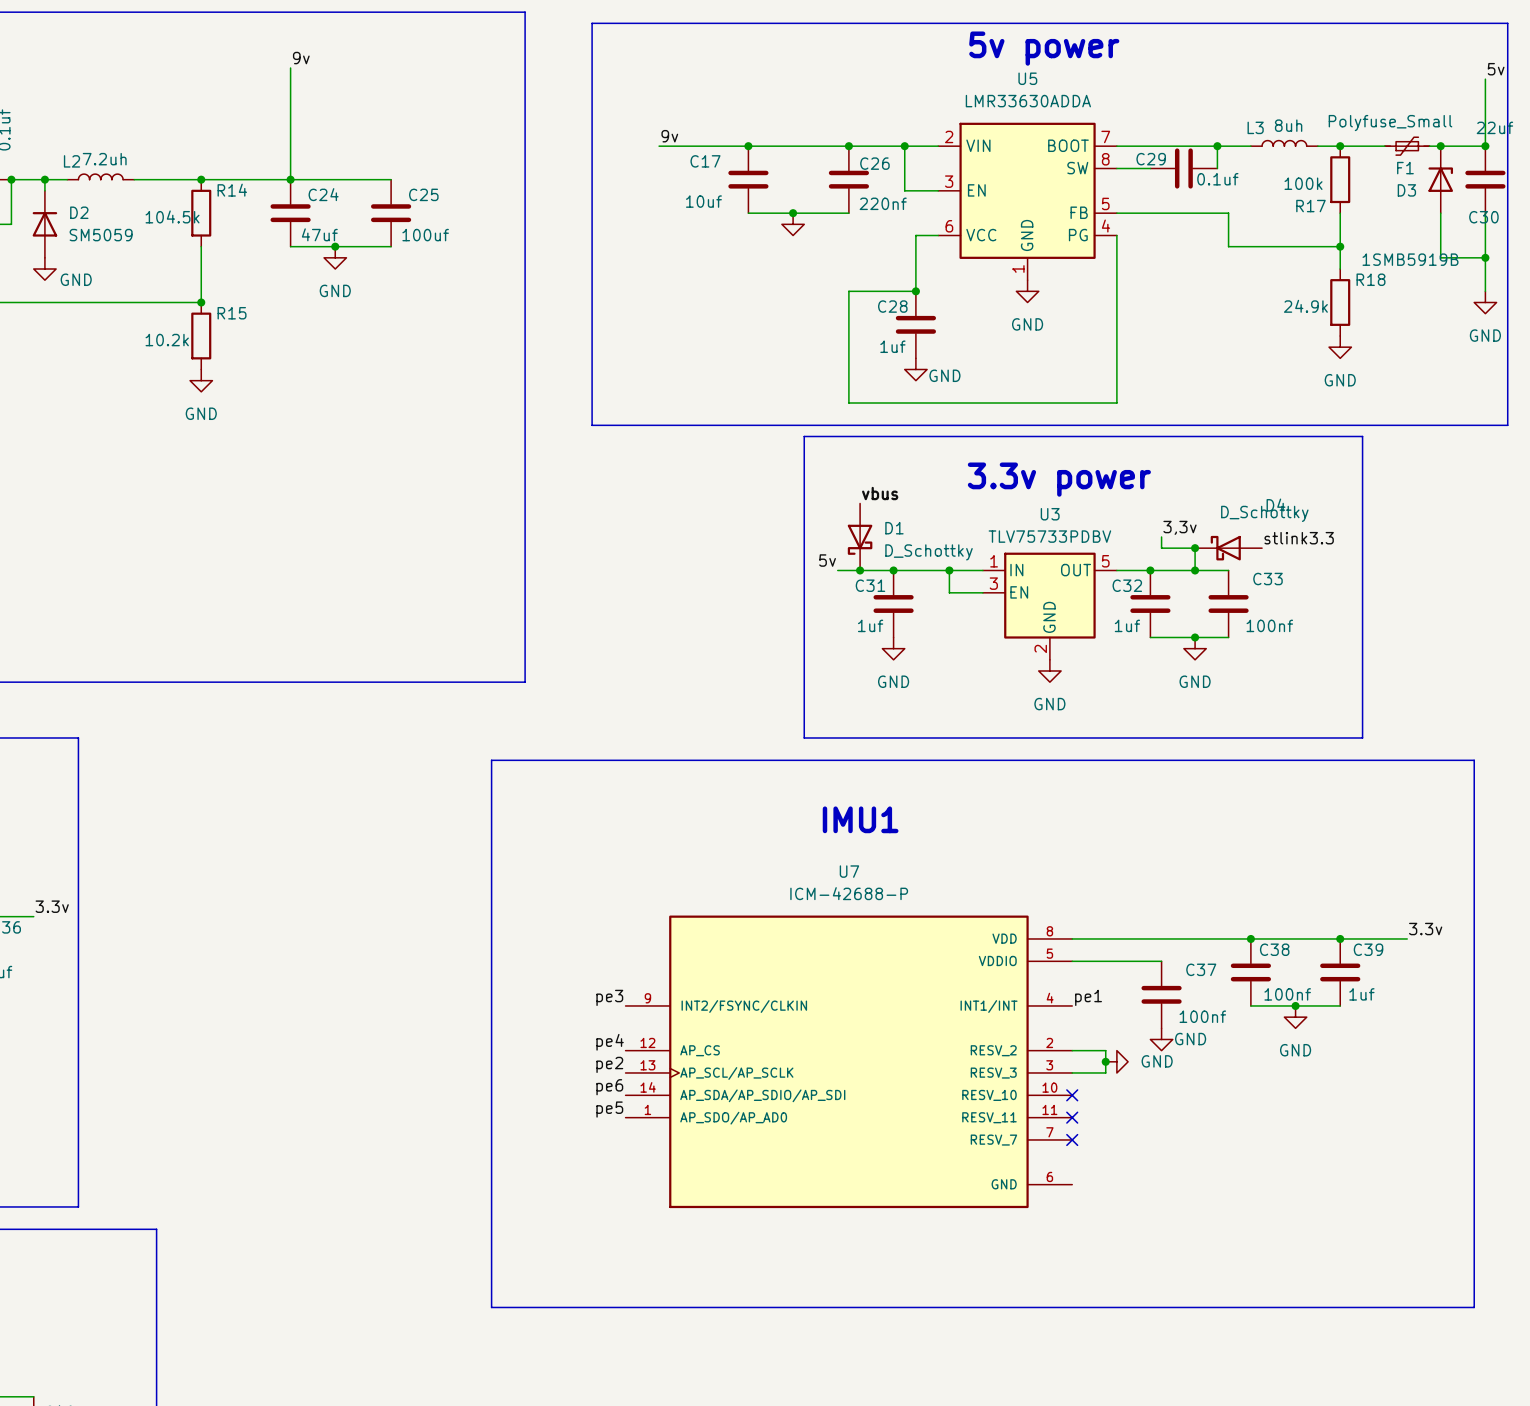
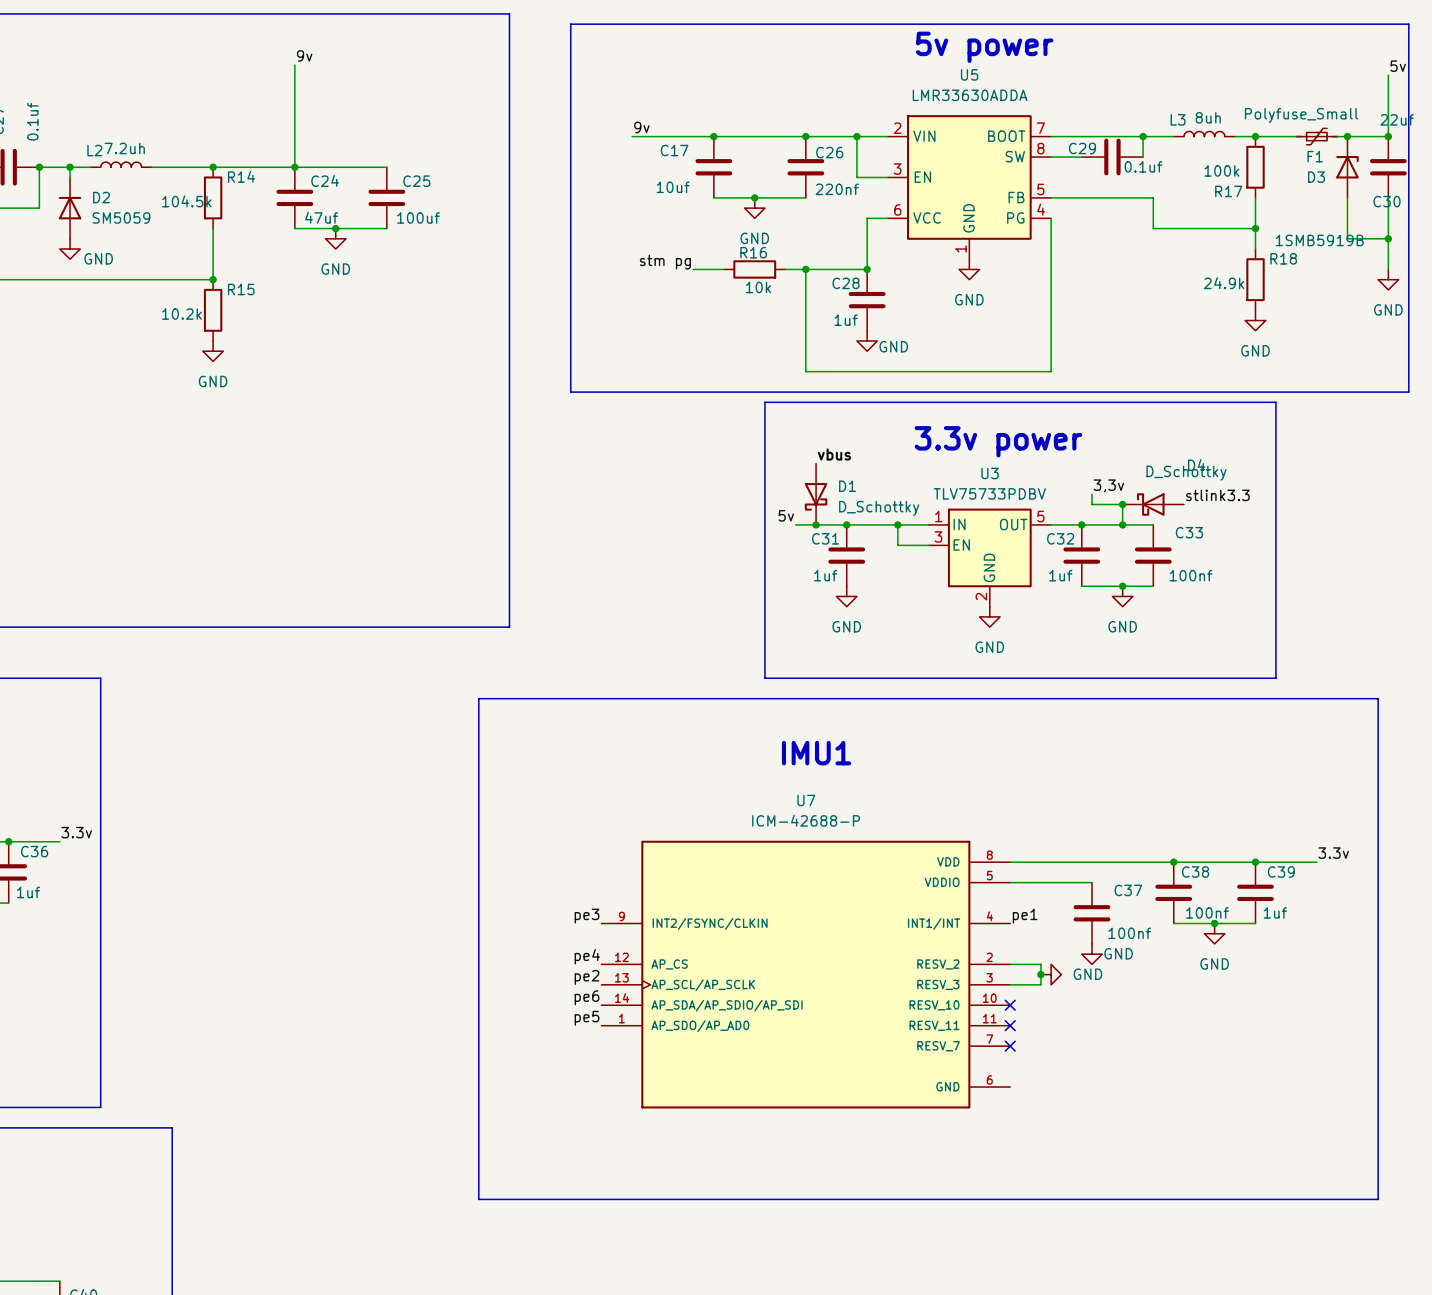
power symbol text: none -> GND (754, 238)
label: none -> stm pg (665, 262)
wire: none -> (693, 269) (724, 269)
R16: none -> 10k (754, 269)
wire: none -> (785, 269) (805, 269)
junction: none -> (805, 269)

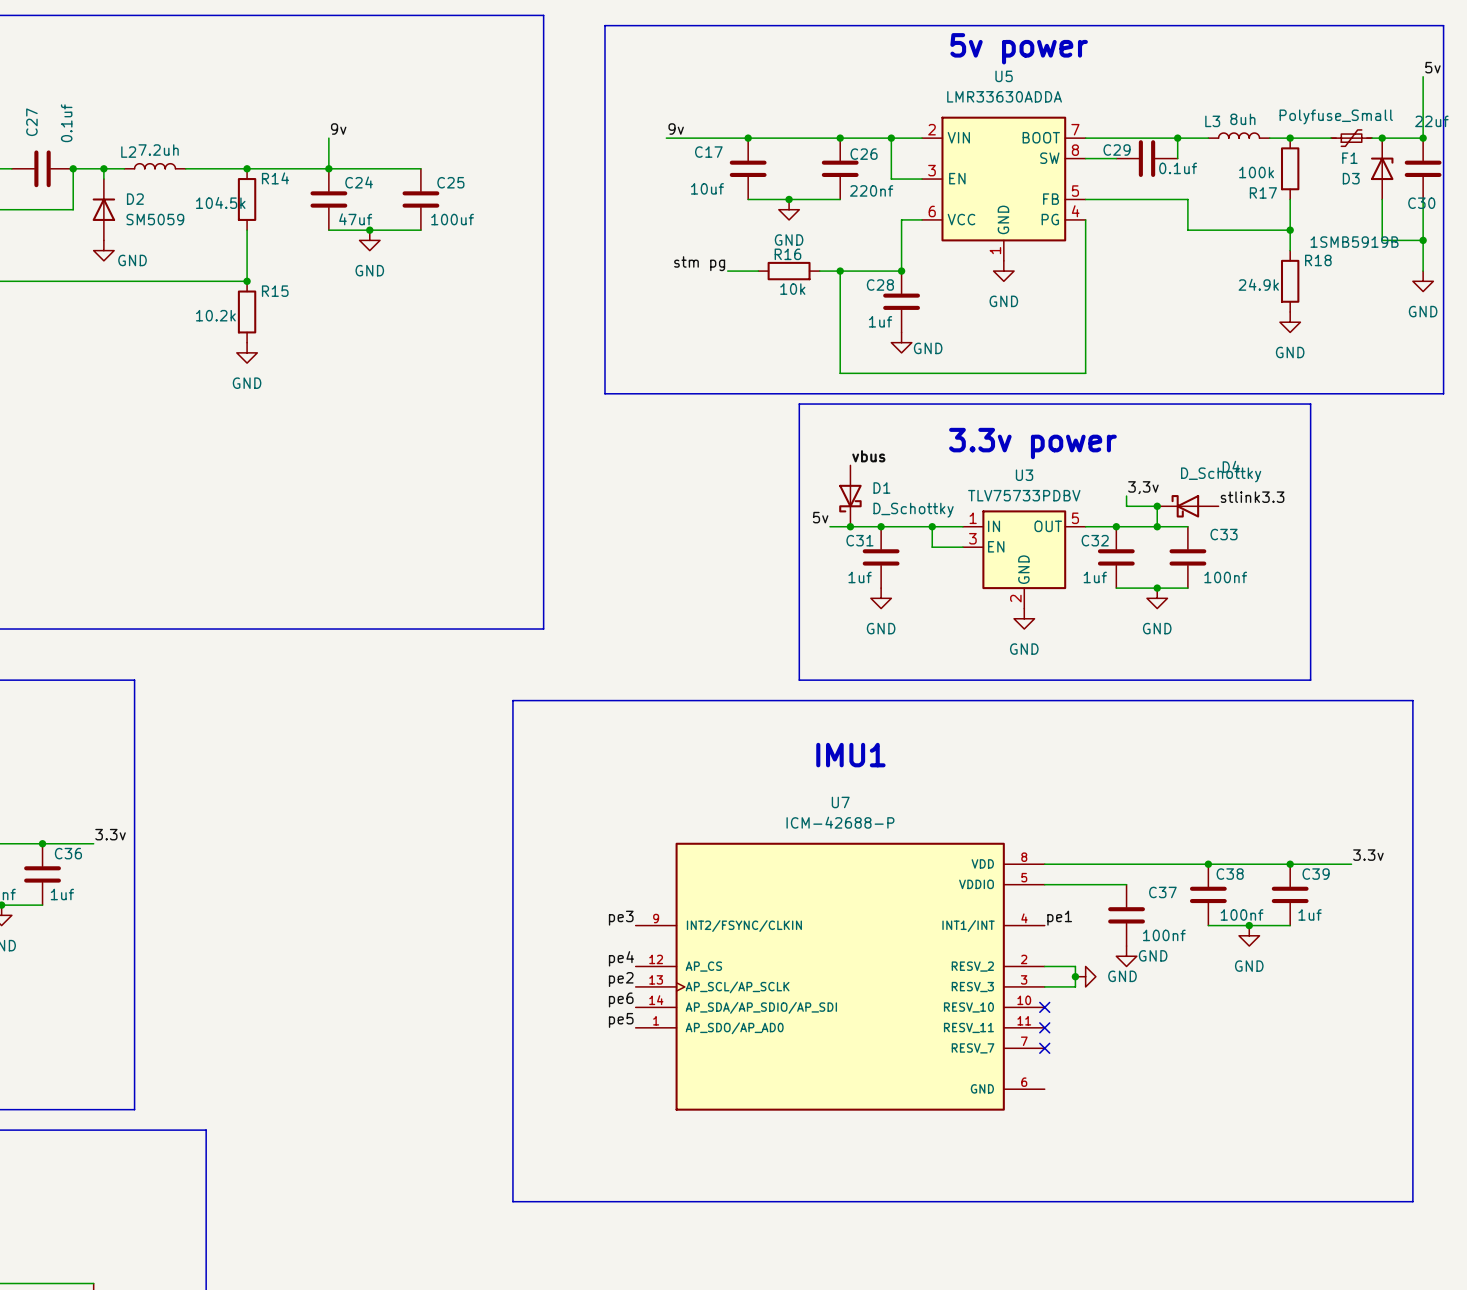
label position: 9v (304, 55) -> 9v (338, 129)
wire: (294, 65) (294, 136) -> none

